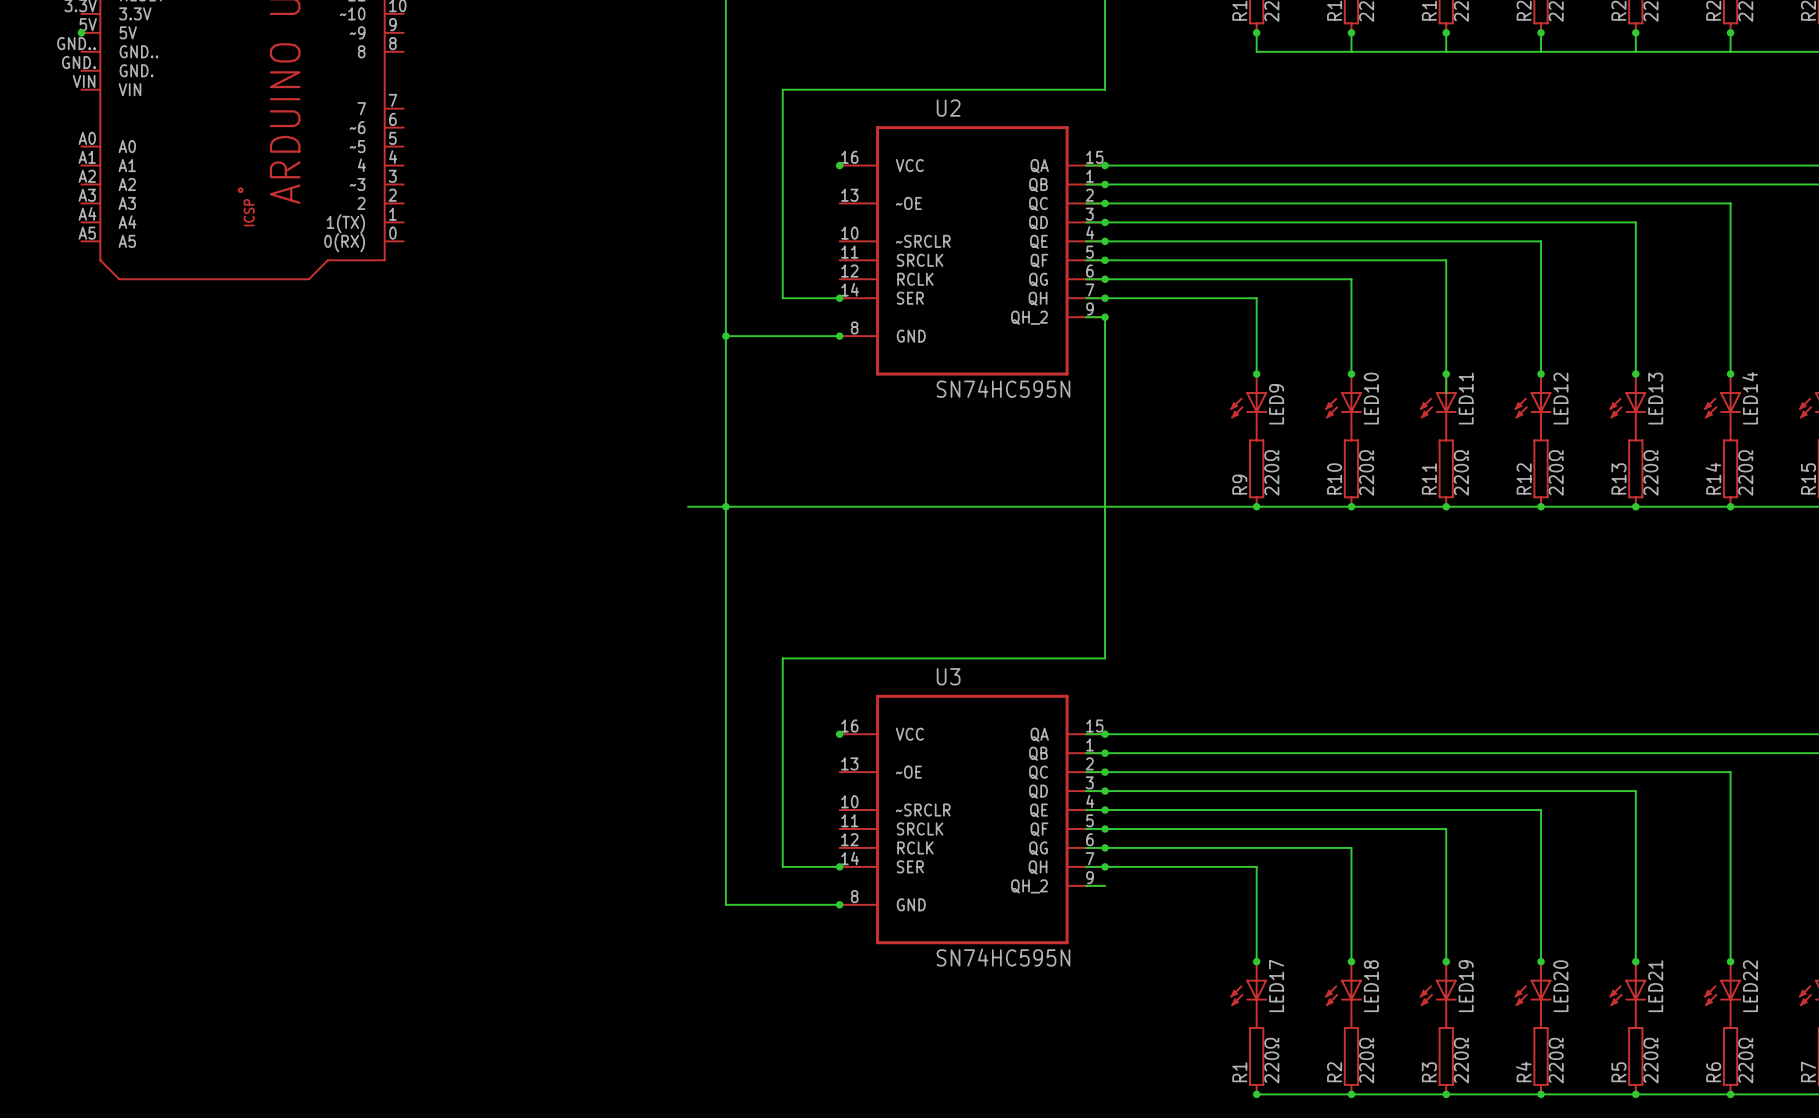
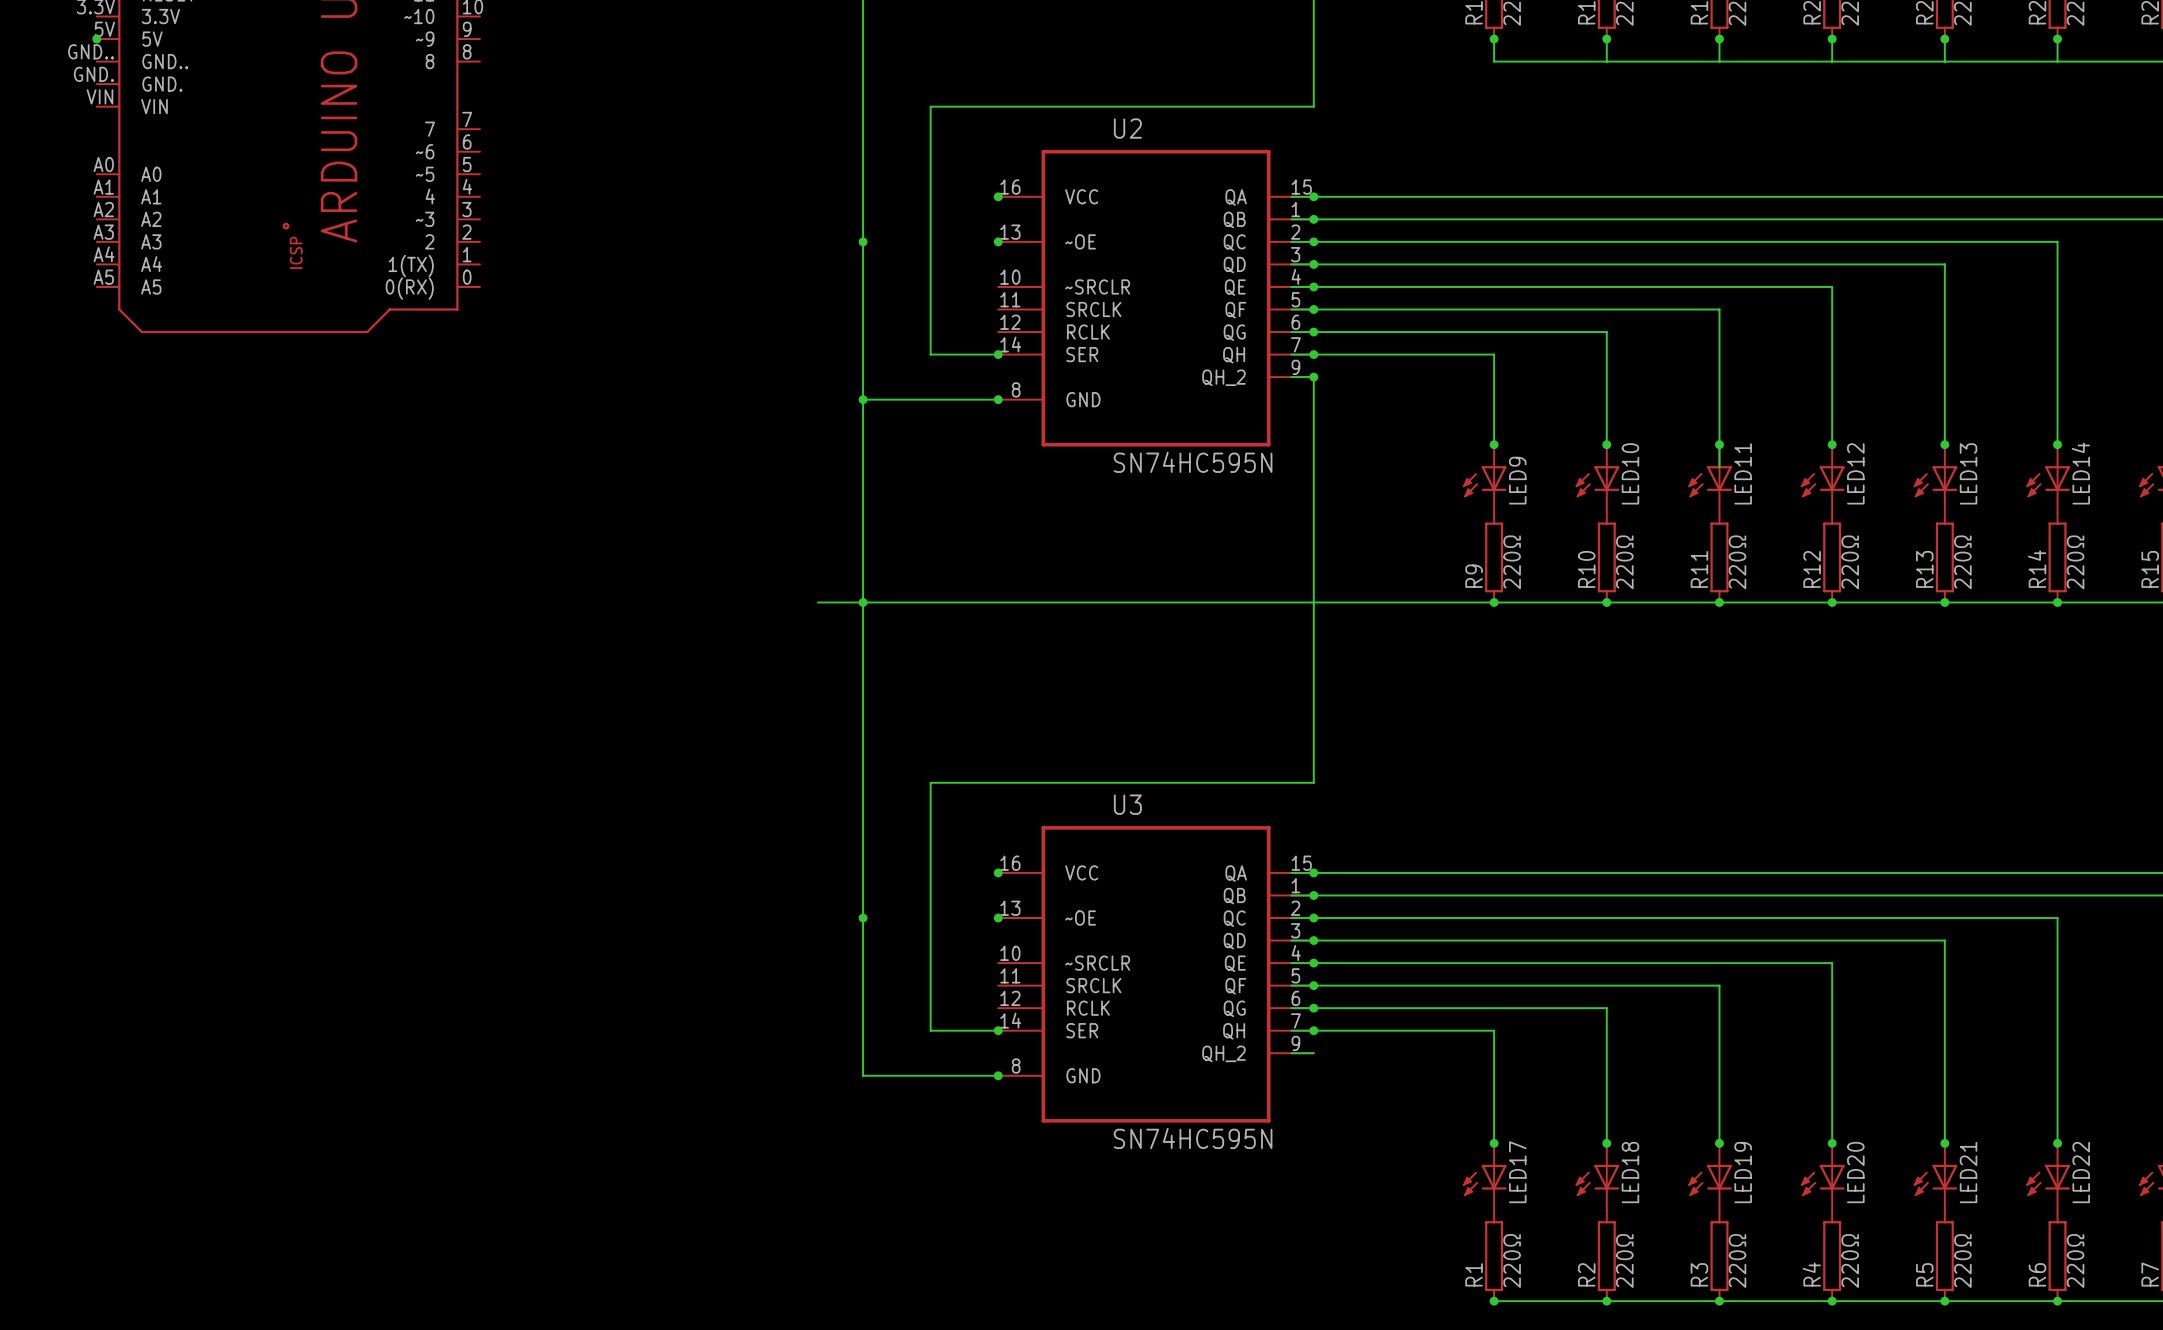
junction: none -> (863, 241)
junction: none -> (998, 241)
junction: none -> (863, 918)
junction: none -> (998, 918)

